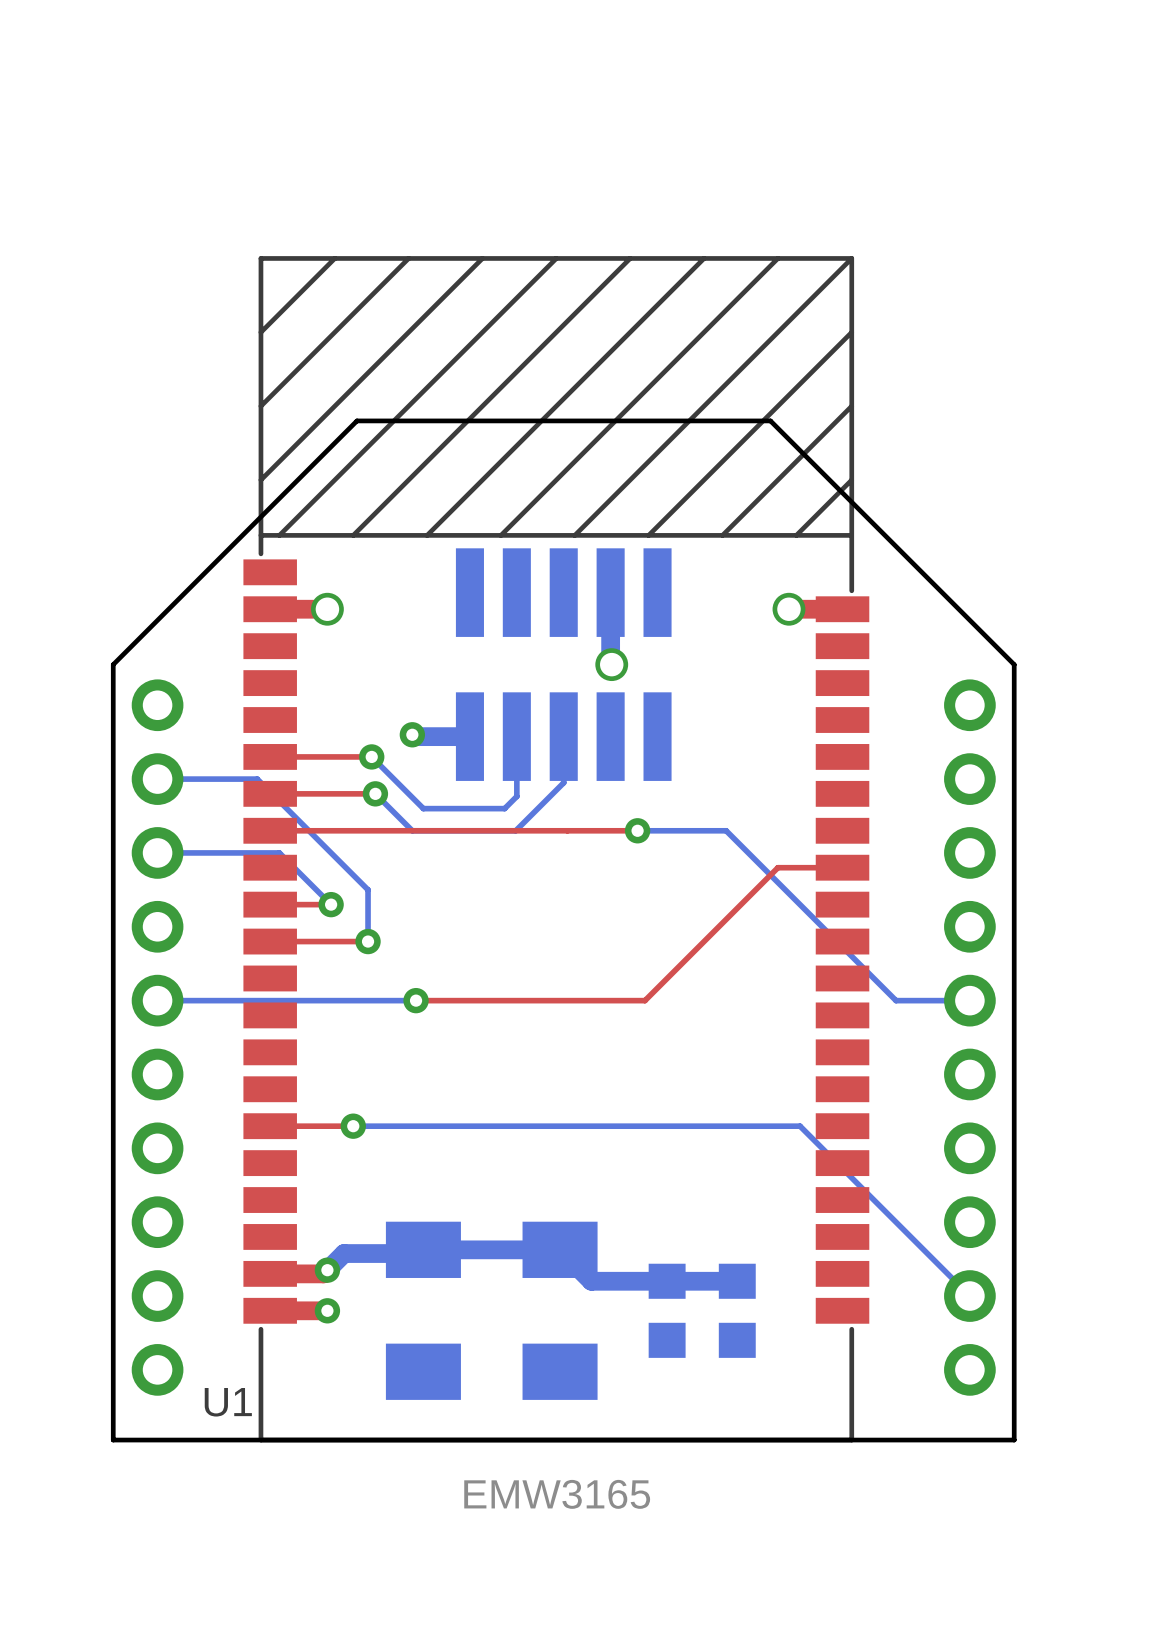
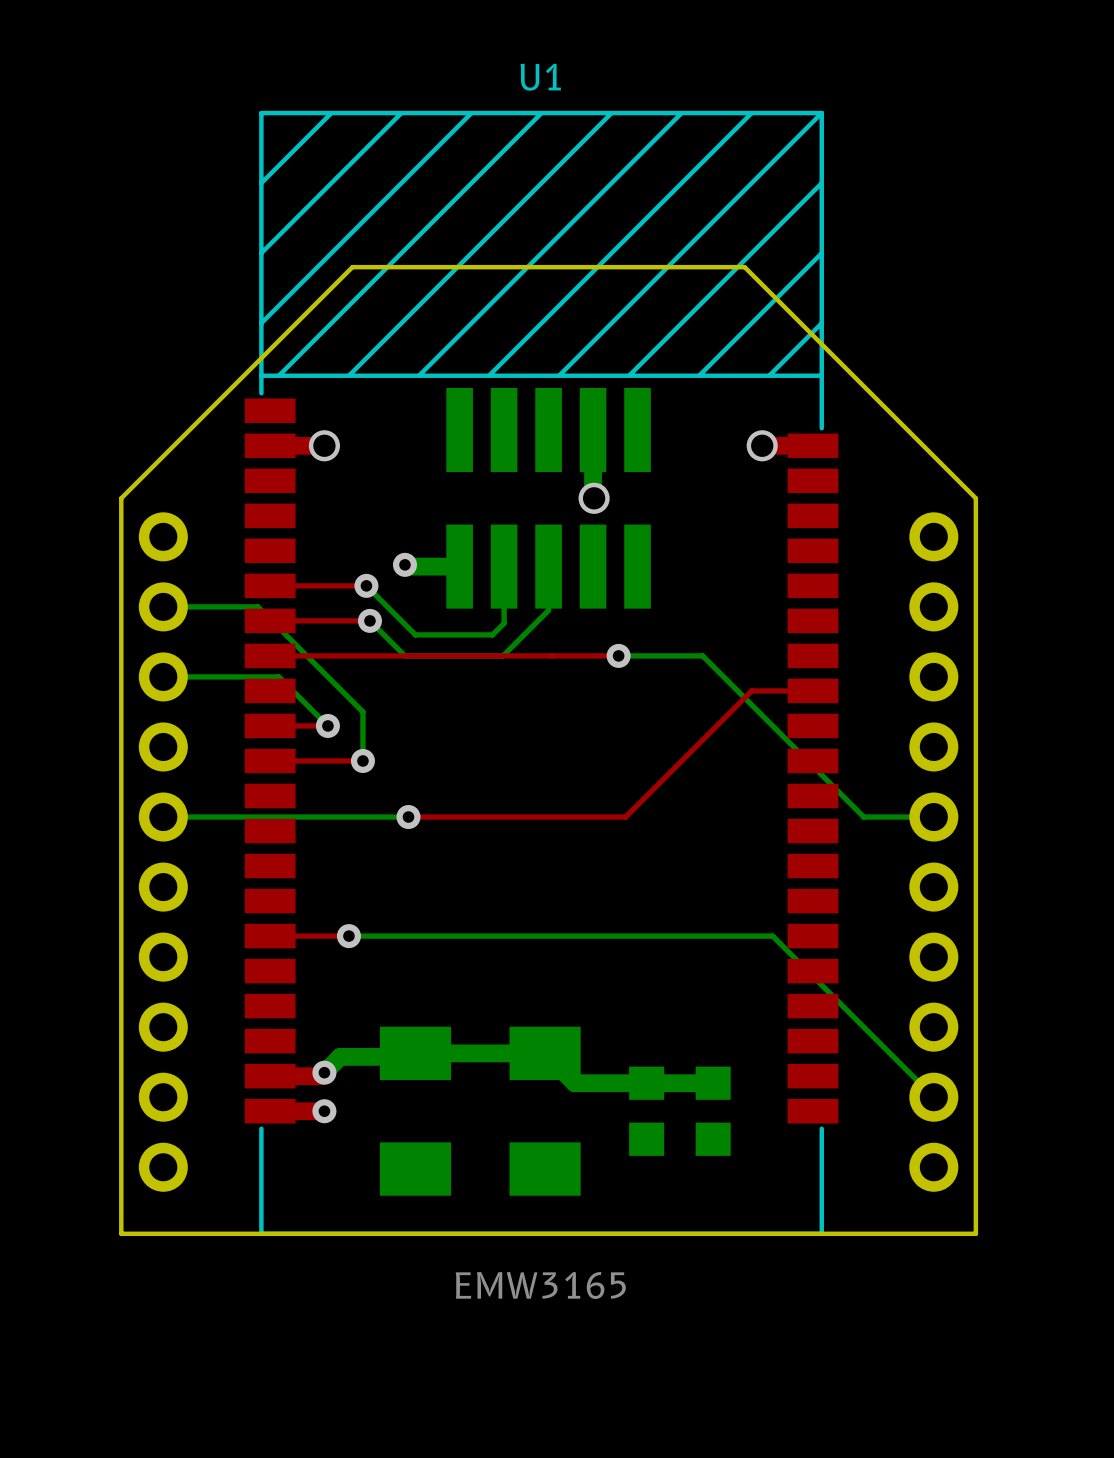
U1 name position: U1 (228, 1402) -> U1 (540, 77)

